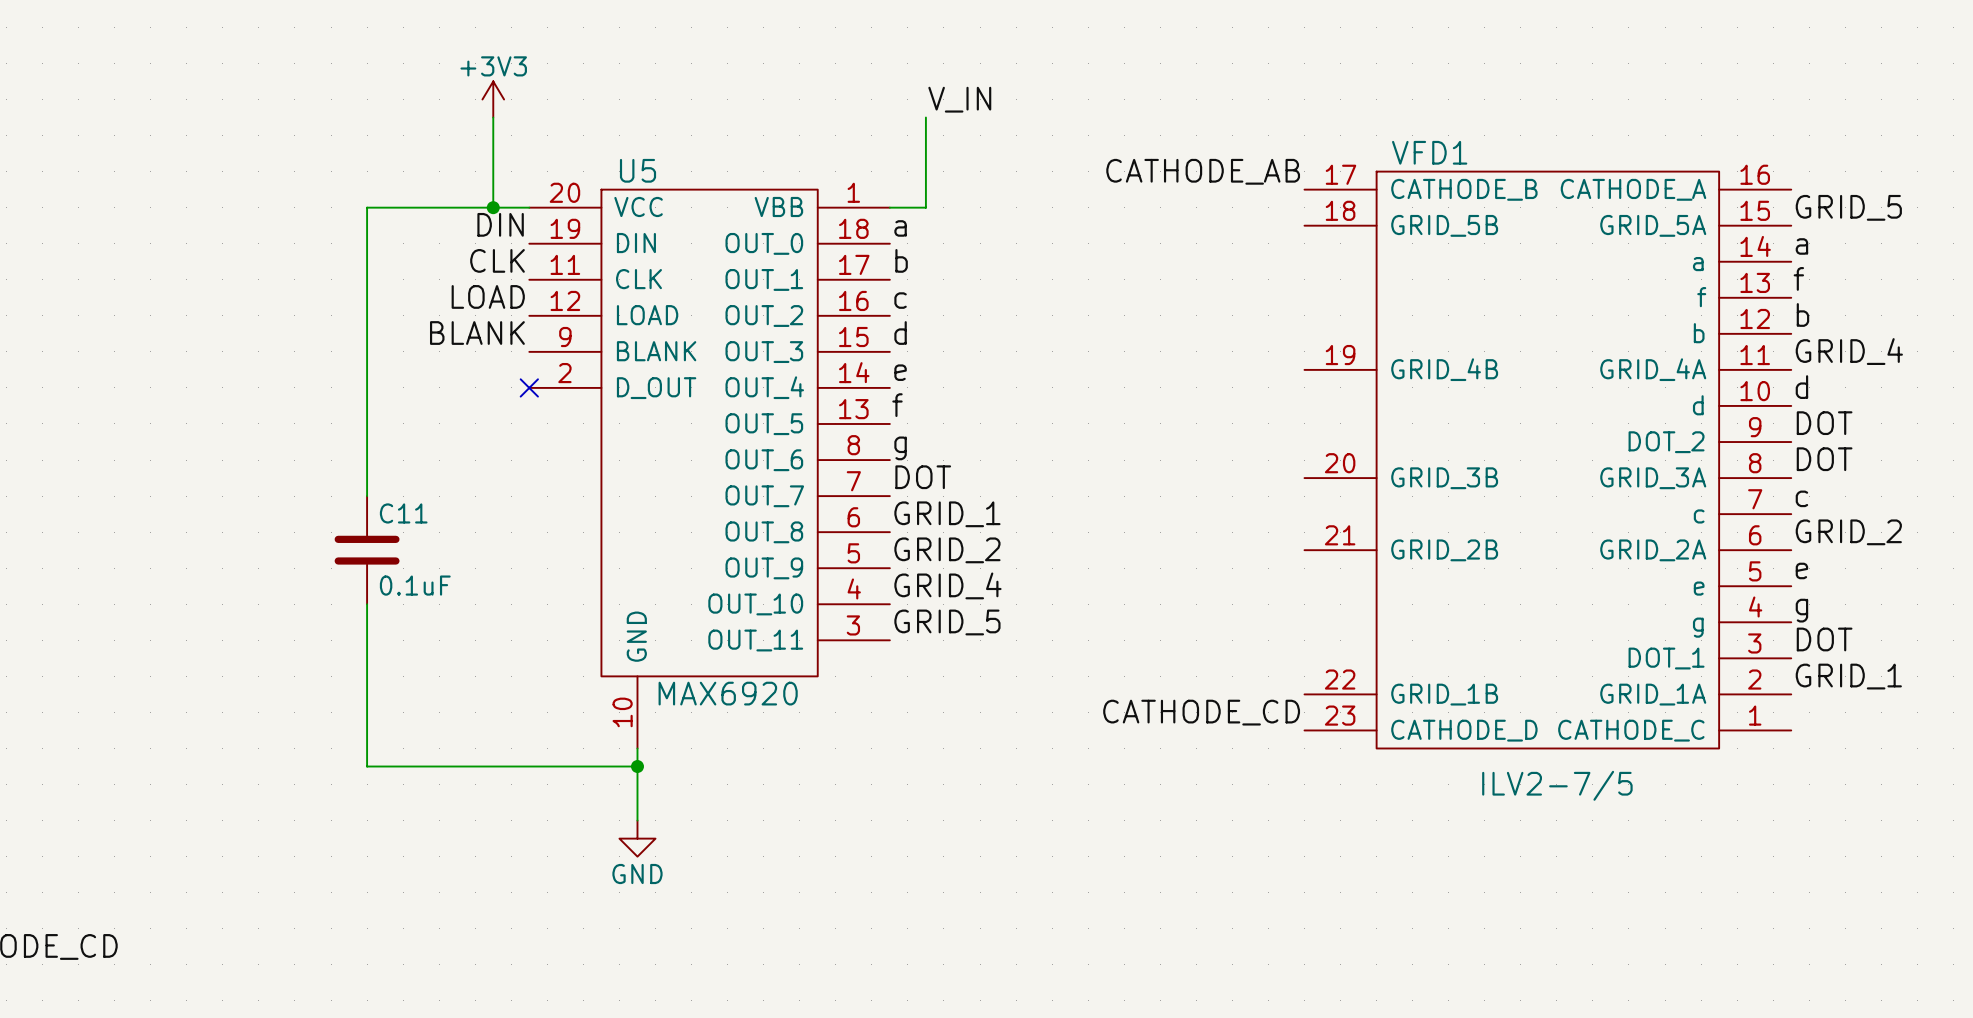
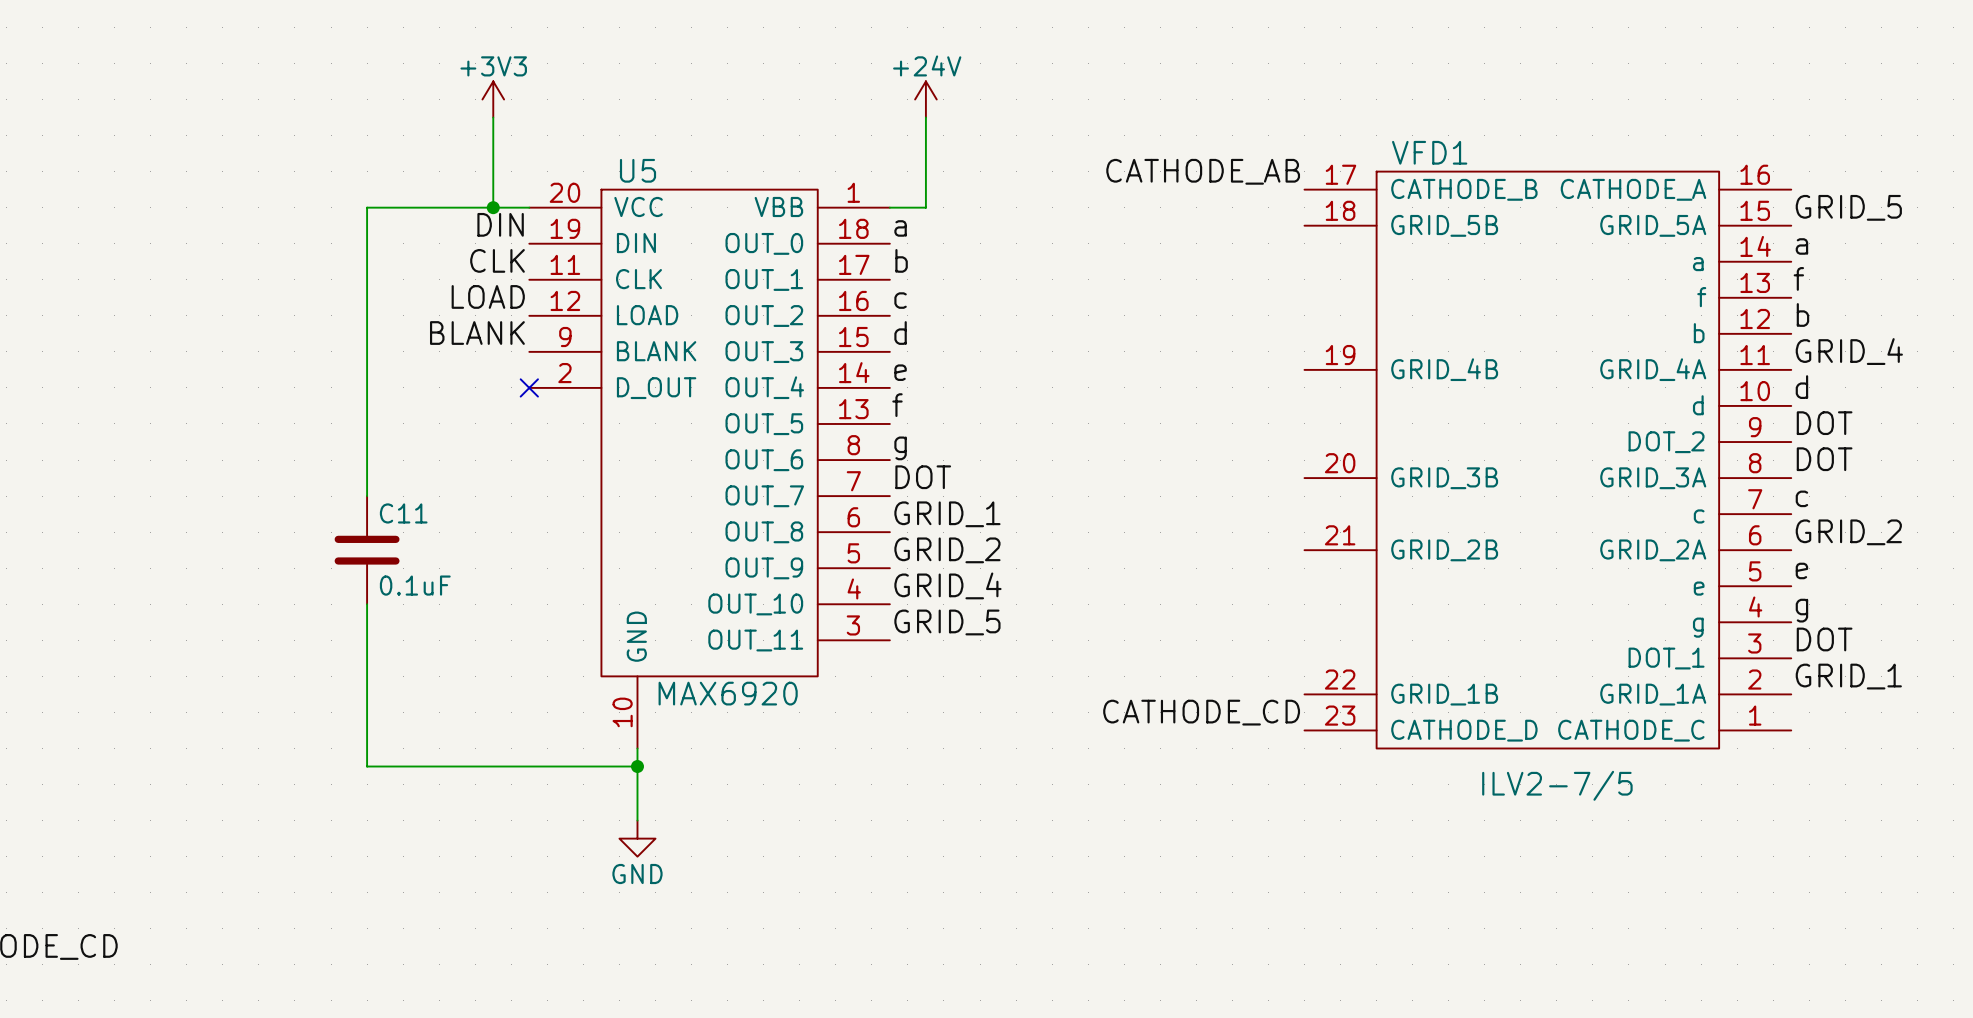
power symbol: none -> +24V (925, 99)
label: V_IN (959, 99) -> none

